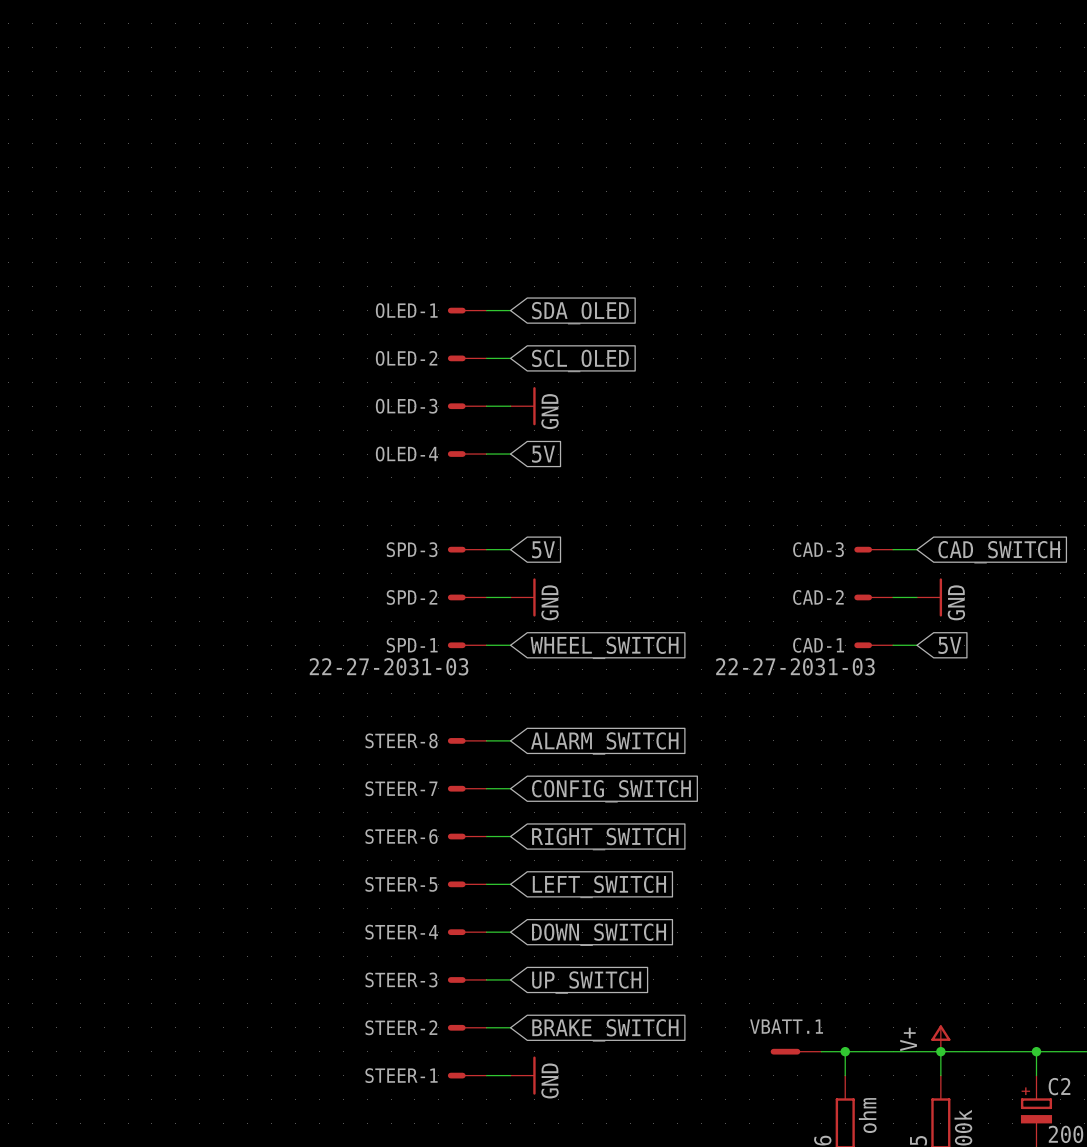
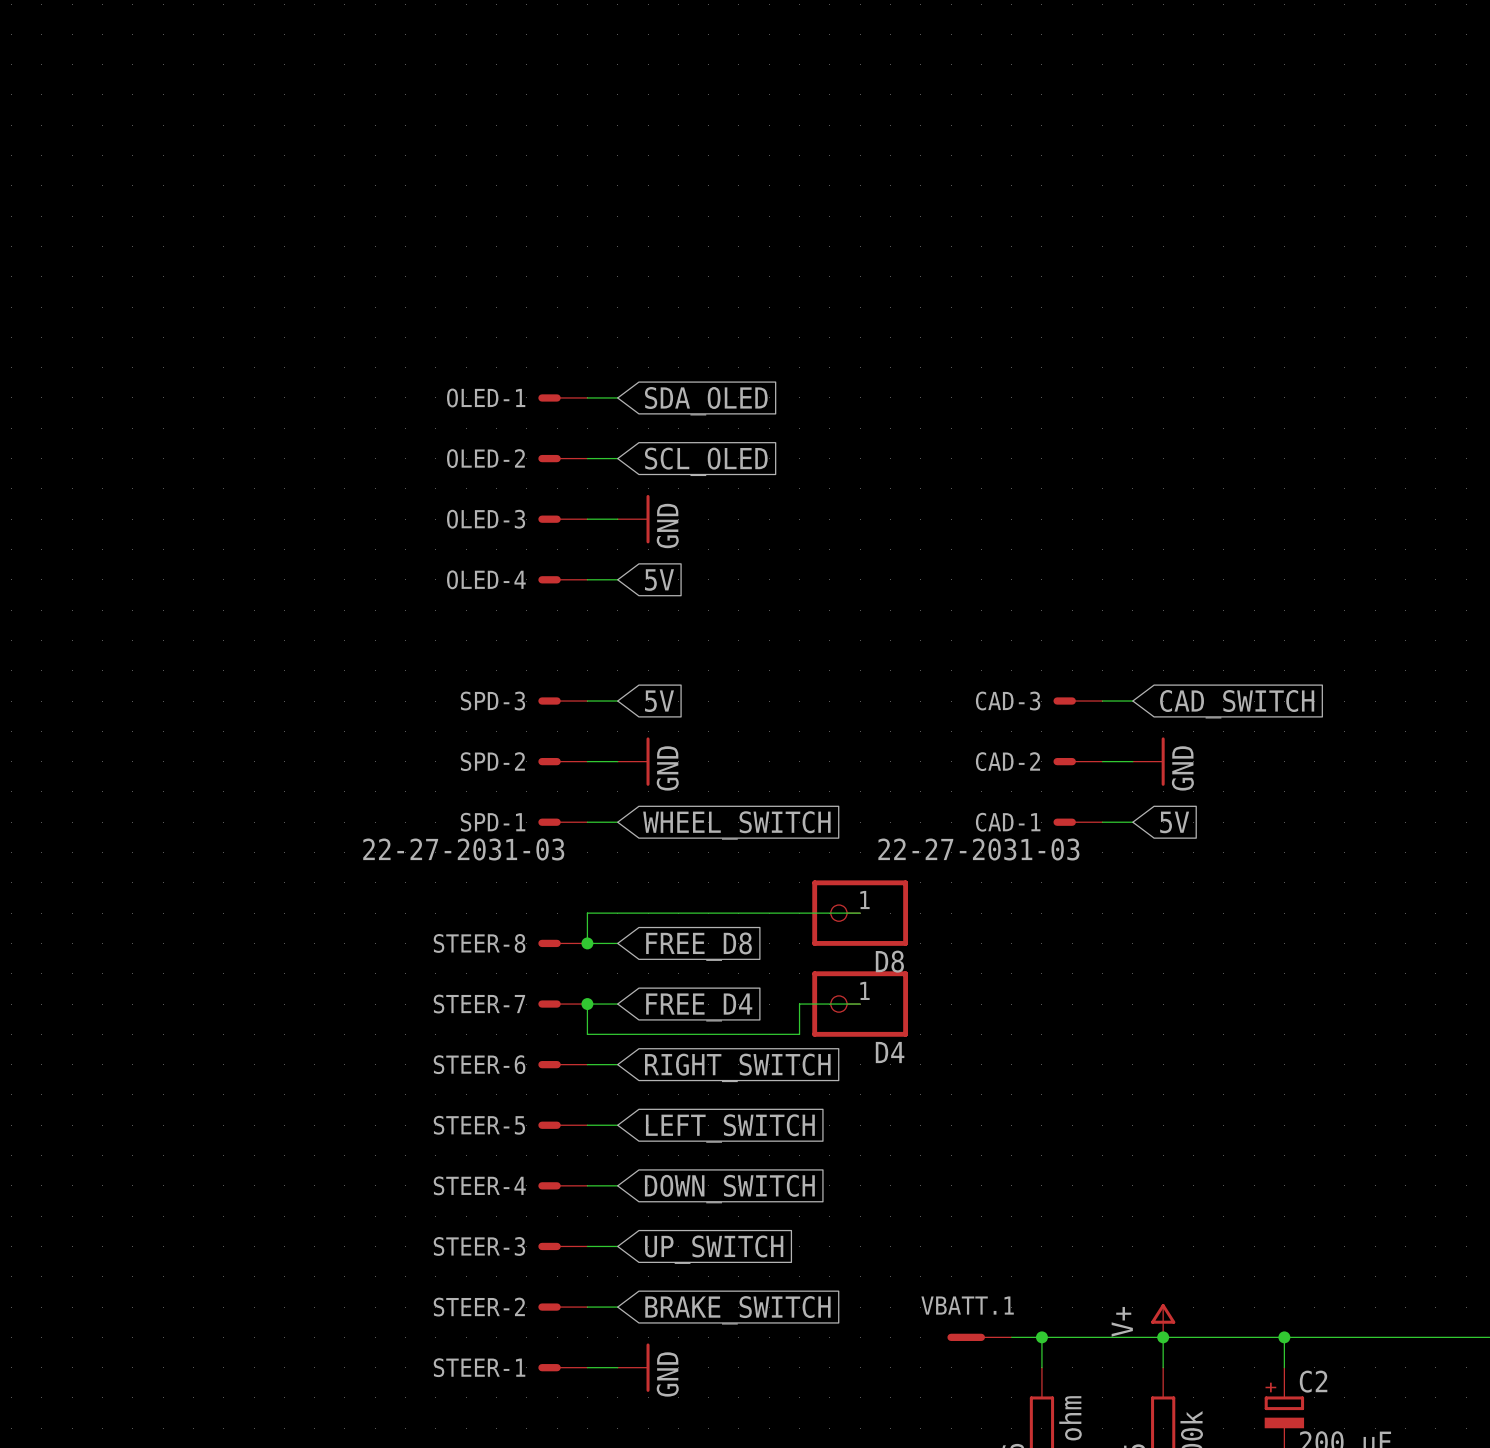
wire: none -> (860, 913) (587, 913) (587, 943)
D8: none -> (860, 913)
junction: none -> (587, 943)
global label: ALARM_SWITCH (604, 743) -> FREE_D8 (699, 946)
wire: none -> (587, 1004) (587, 1034) (799, 1034) (799, 1004) (860, 1004)
junction: none -> (587, 1004)
D4: none -> (860, 1004)
global label: CONFIG_SWITCH (611, 791) -> FREE_D4 (699, 1007)

